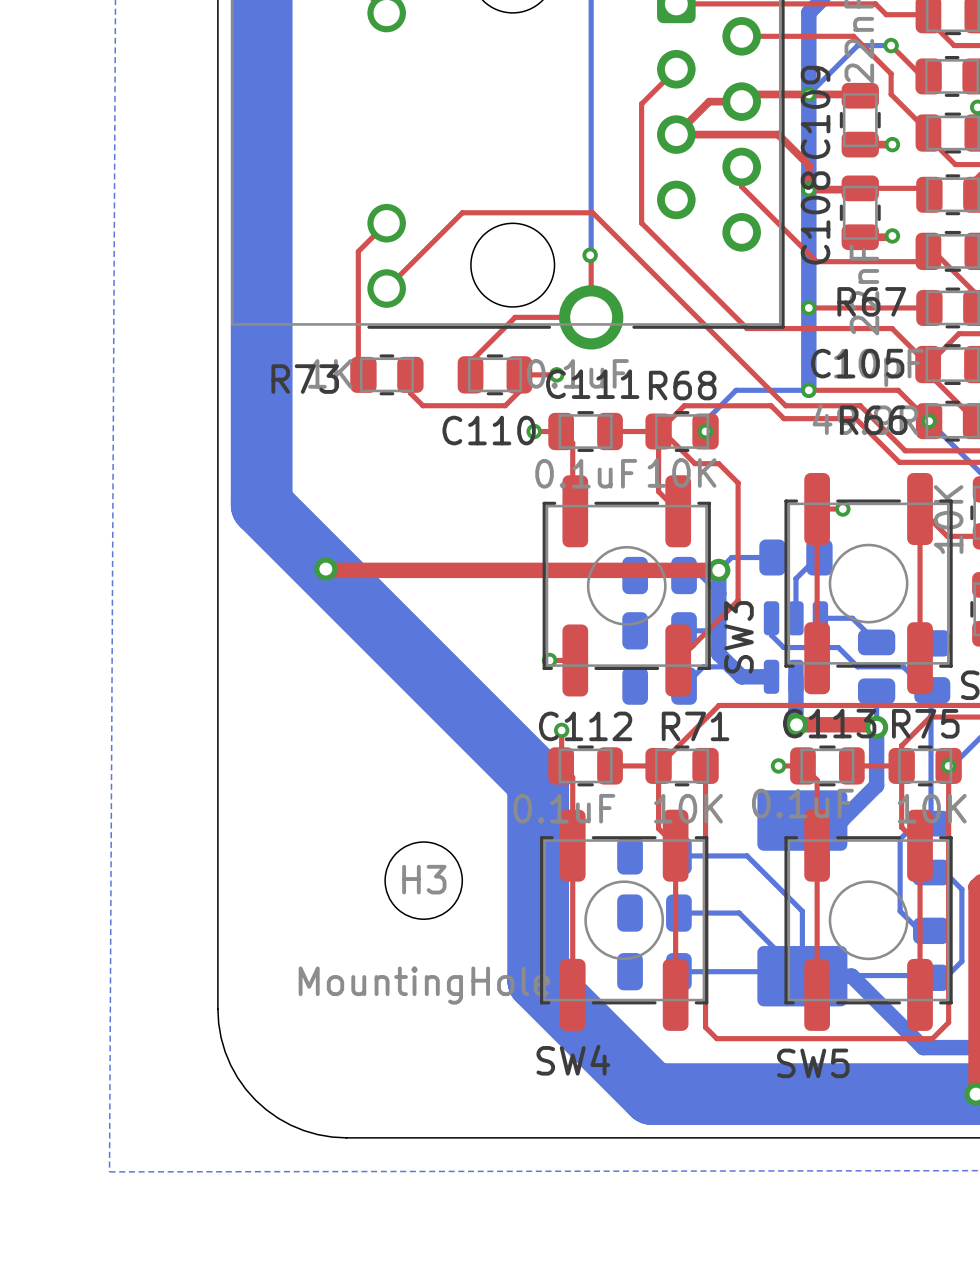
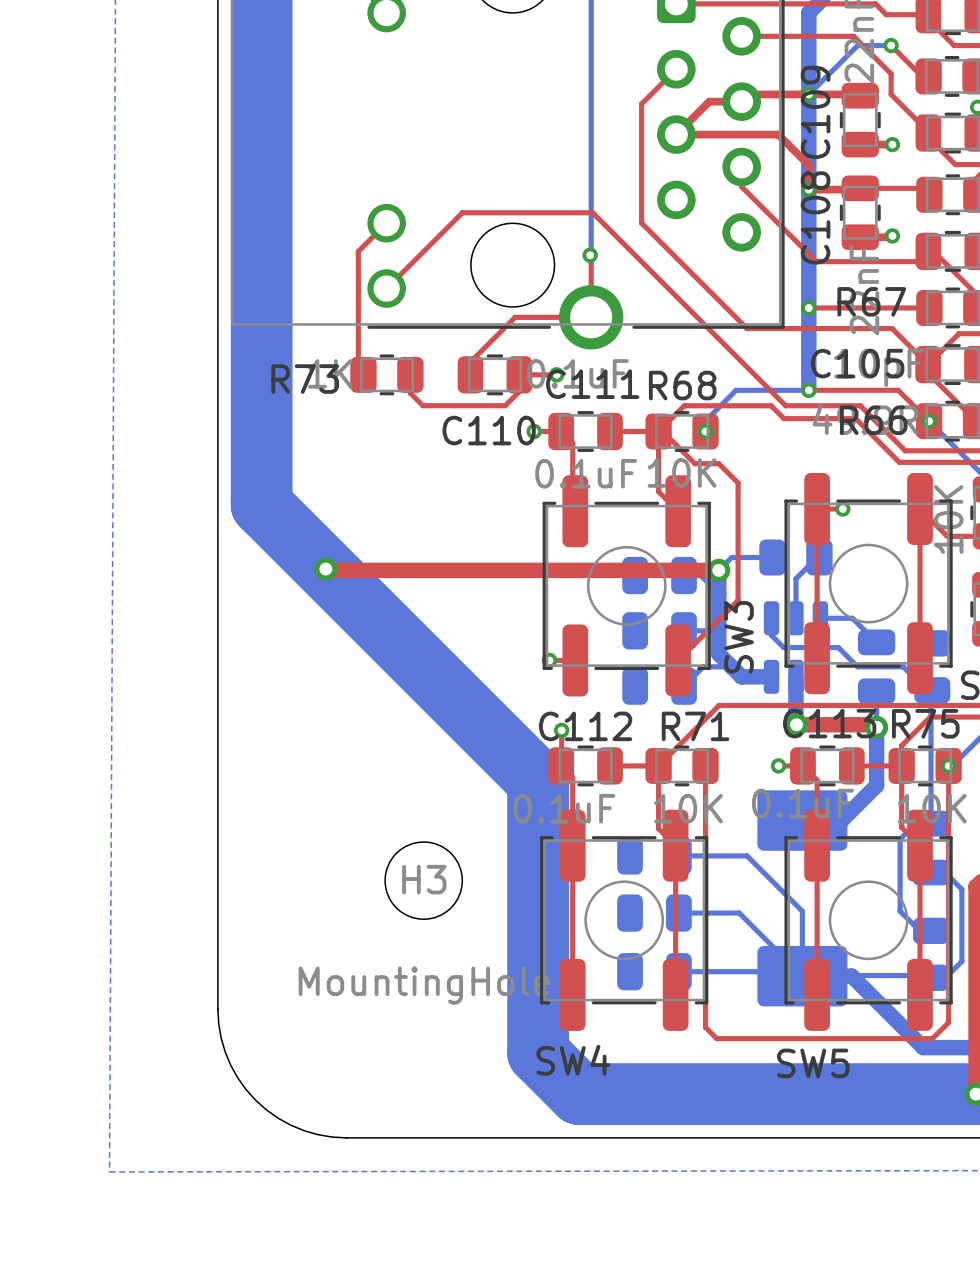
bottom track: (538, 980) (652, 1094) -> (538, 980) (538, 1052) (579, 1094) (652, 1094)

